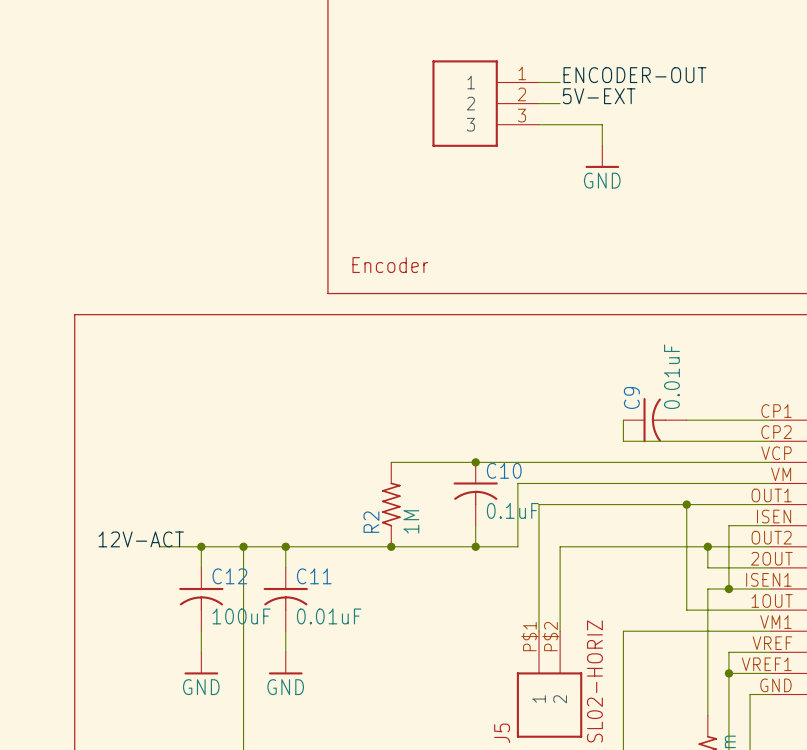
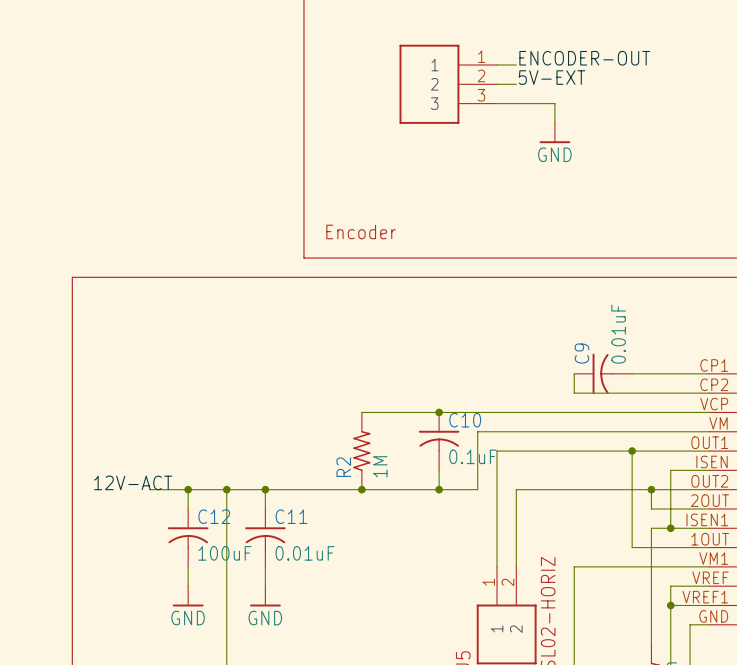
J5 pin number: P$1 (529, 636) -> 1 (488, 582)
J5 pin number: P$2 (550, 636) -> 2 (507, 582)

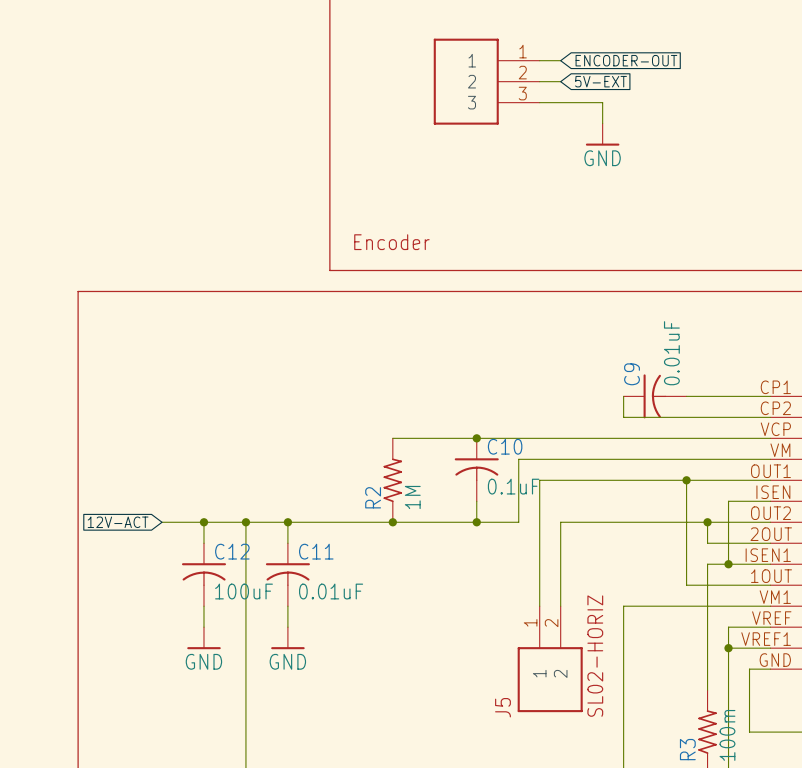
label: ENCODER-OUT (584, 58) -> none
global label: none -> ENCODER-OUT (626, 60)
label: 5V-EXT (552, 77) -> none
global label: none -> 5V-EXT (601, 81)
label: 12V-ACT (133, 482) -> none
global label: none -> 12V-ACT (118, 522)

